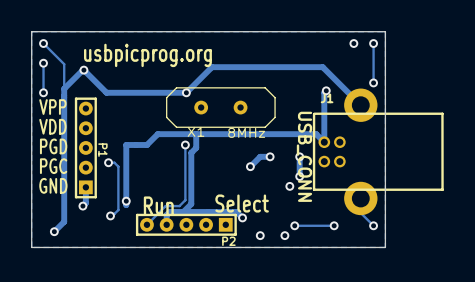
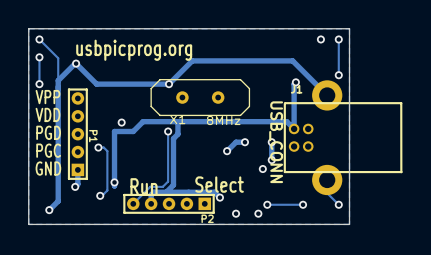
via: none -> (121, 122)

